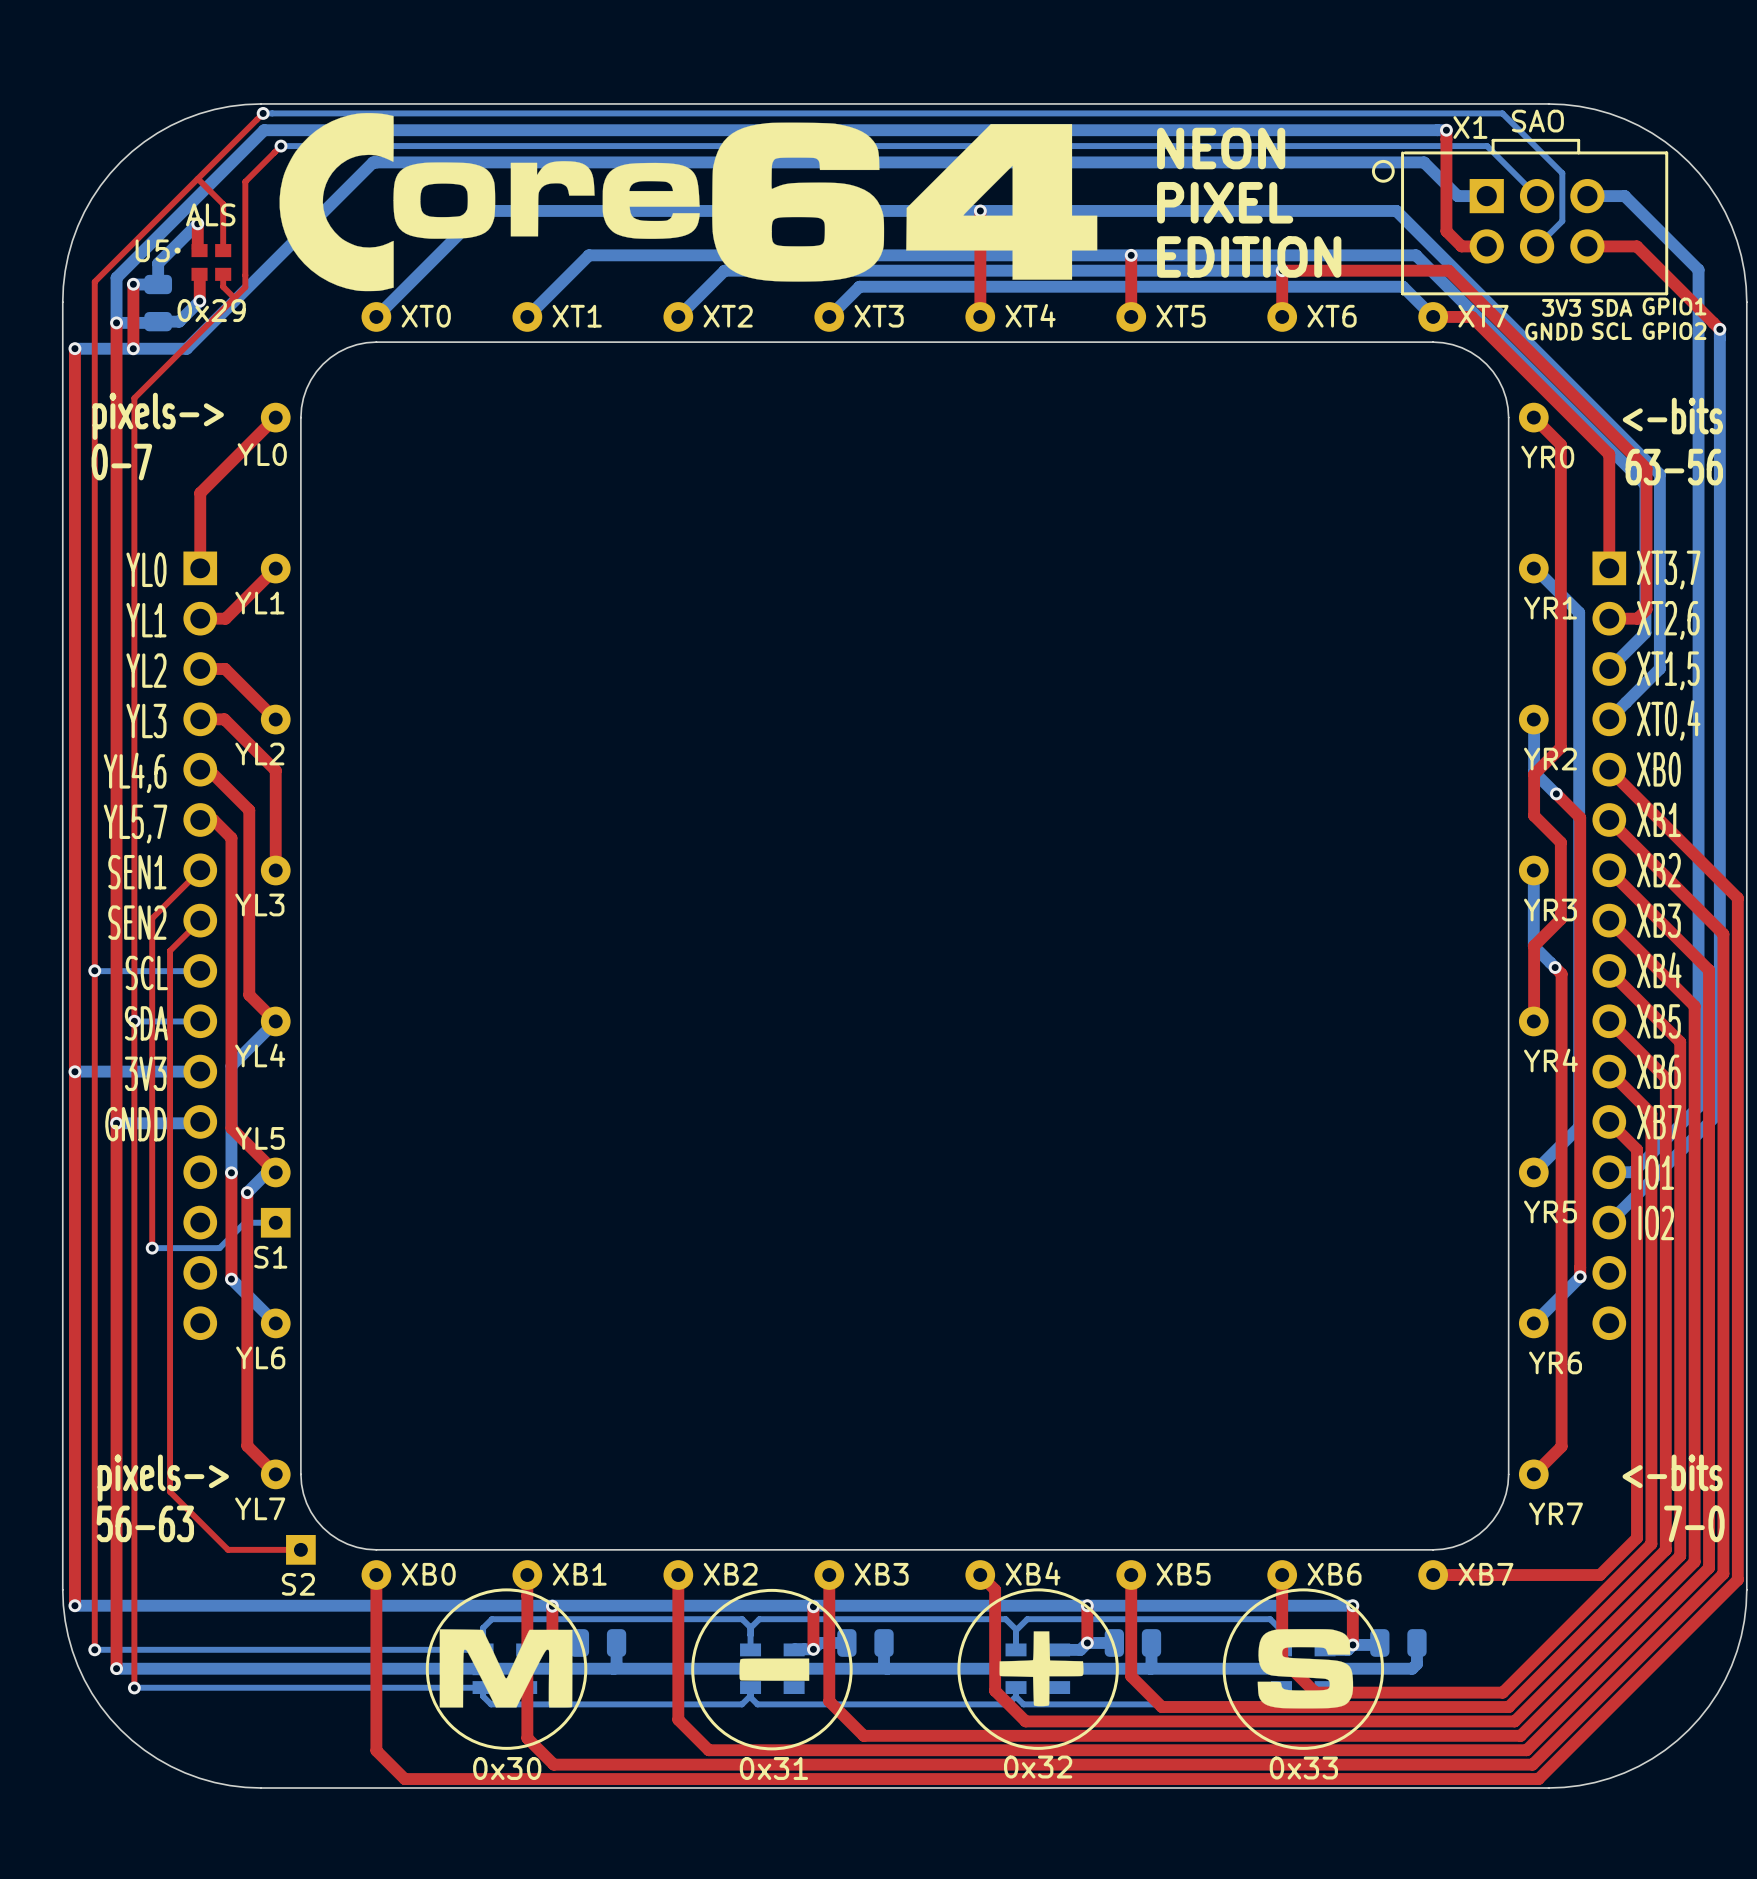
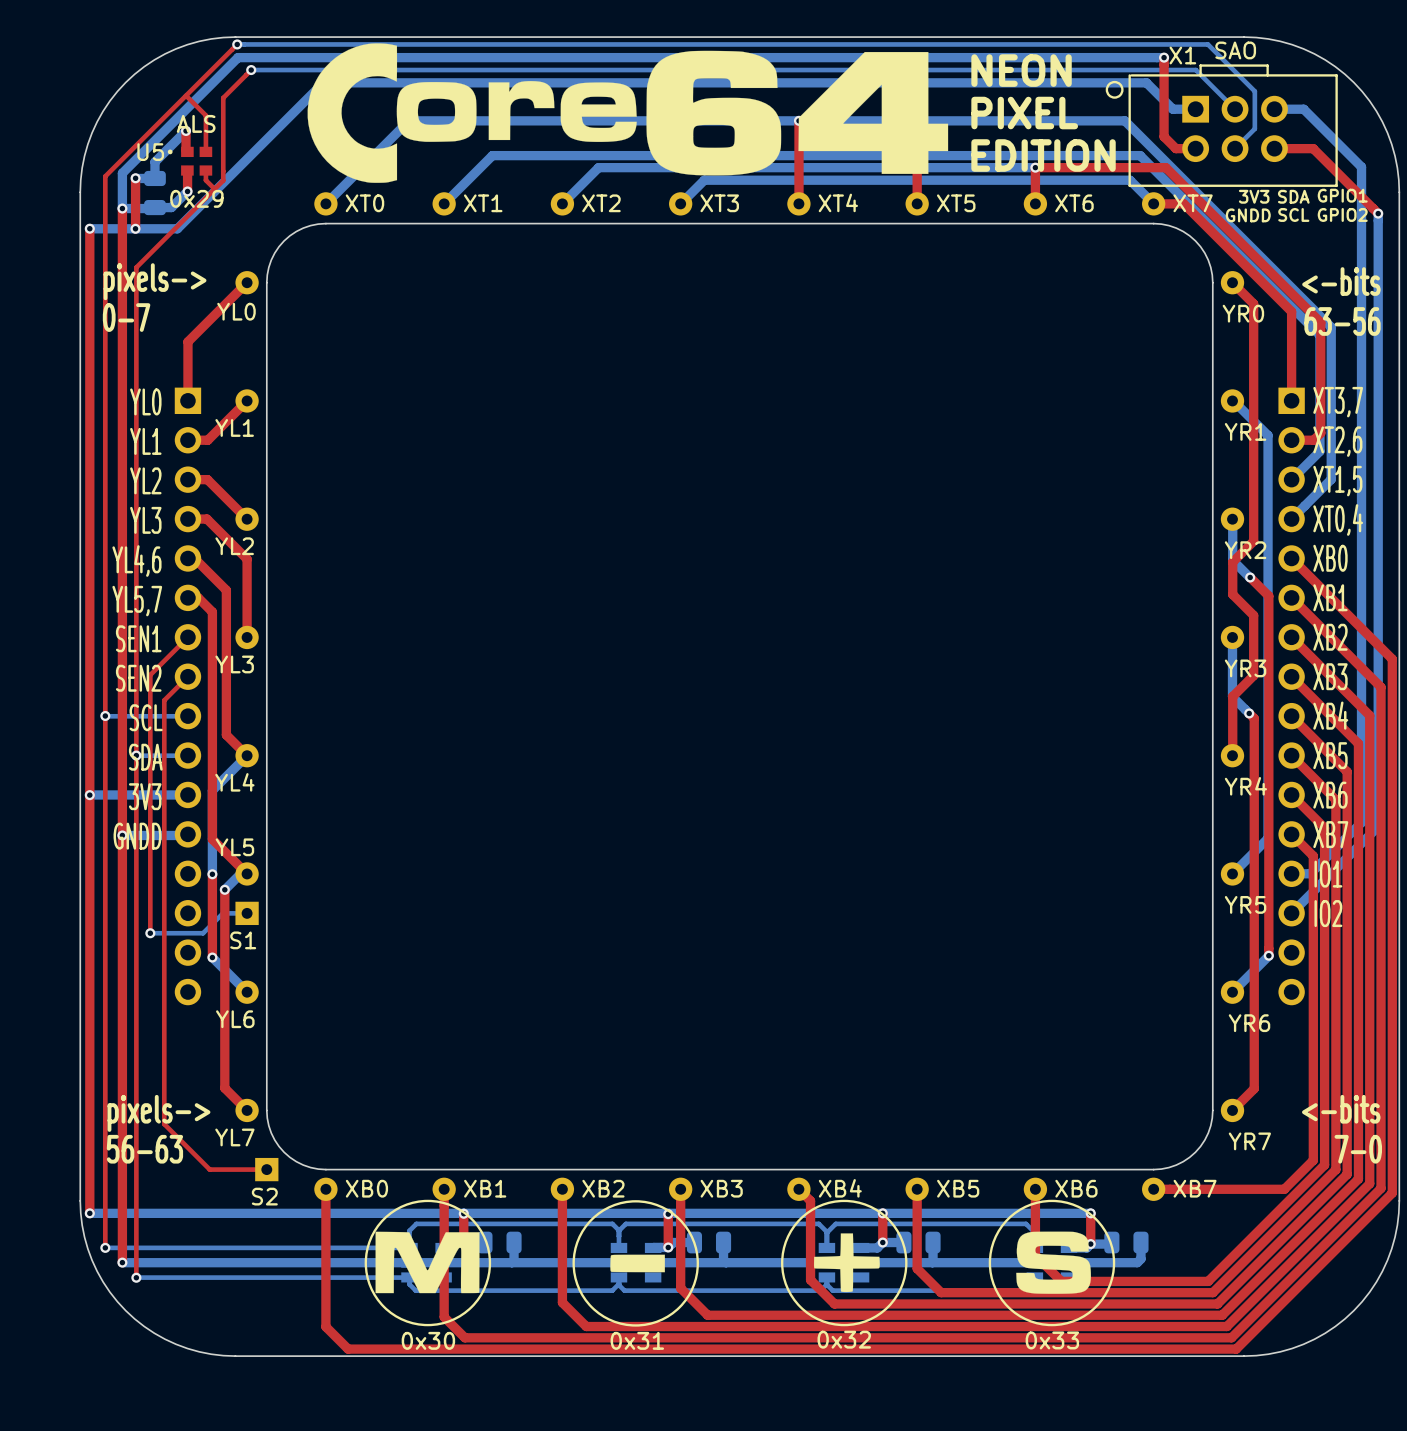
text position: NEON (1221, 148) -> NEON (1021, 70)
drawing position: (688, 202) -> (627, 113)
text position: PIXEL (1225, 202) -> PIXEL (1024, 113)
text position: EDITION (1249, 256) -> EDITION (1043, 155)

